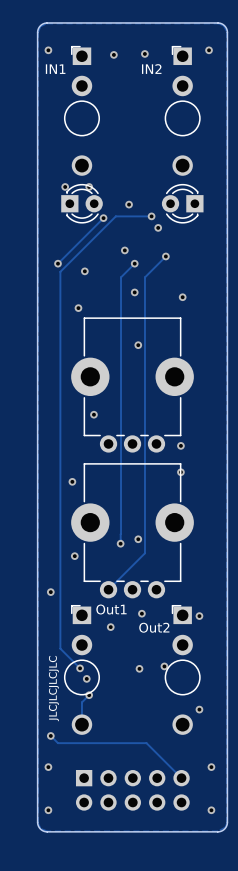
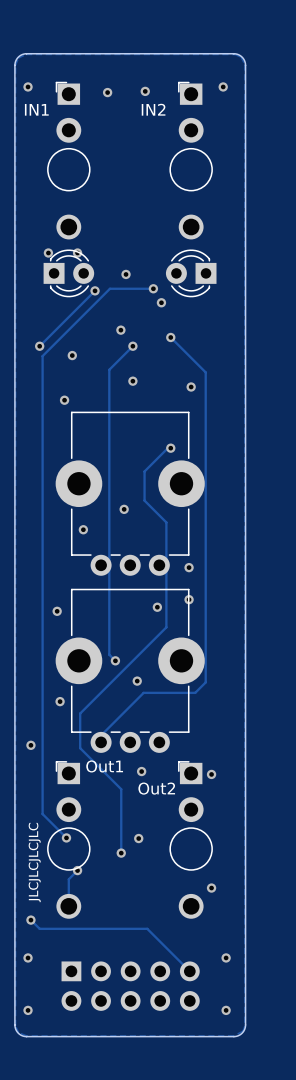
track: (165, 256) (144, 277) (144, 553) (108, 589) -> (170, 337) (205, 372) (205, 682) (195, 692) (143, 692) (94, 742)
track: (121, 277) (120, 543) -> (116, 362) (109, 369) (109, 654) (115, 660)
via: (138, 345) -> none
track: none -> (170, 448) (167, 448) (144, 471) (144, 500) (166, 522) (166, 627) (80, 713) (80, 748) (121, 789) (121, 853)
via: none -> (170, 448)
via: none -> (124, 509)
via: none -> (157, 607)
via position: (120, 543) -> (115, 660)
via: (110, 627) -> none
via: (164, 666) -> none
via: (86, 678) -> none
via: none -> (121, 853)

